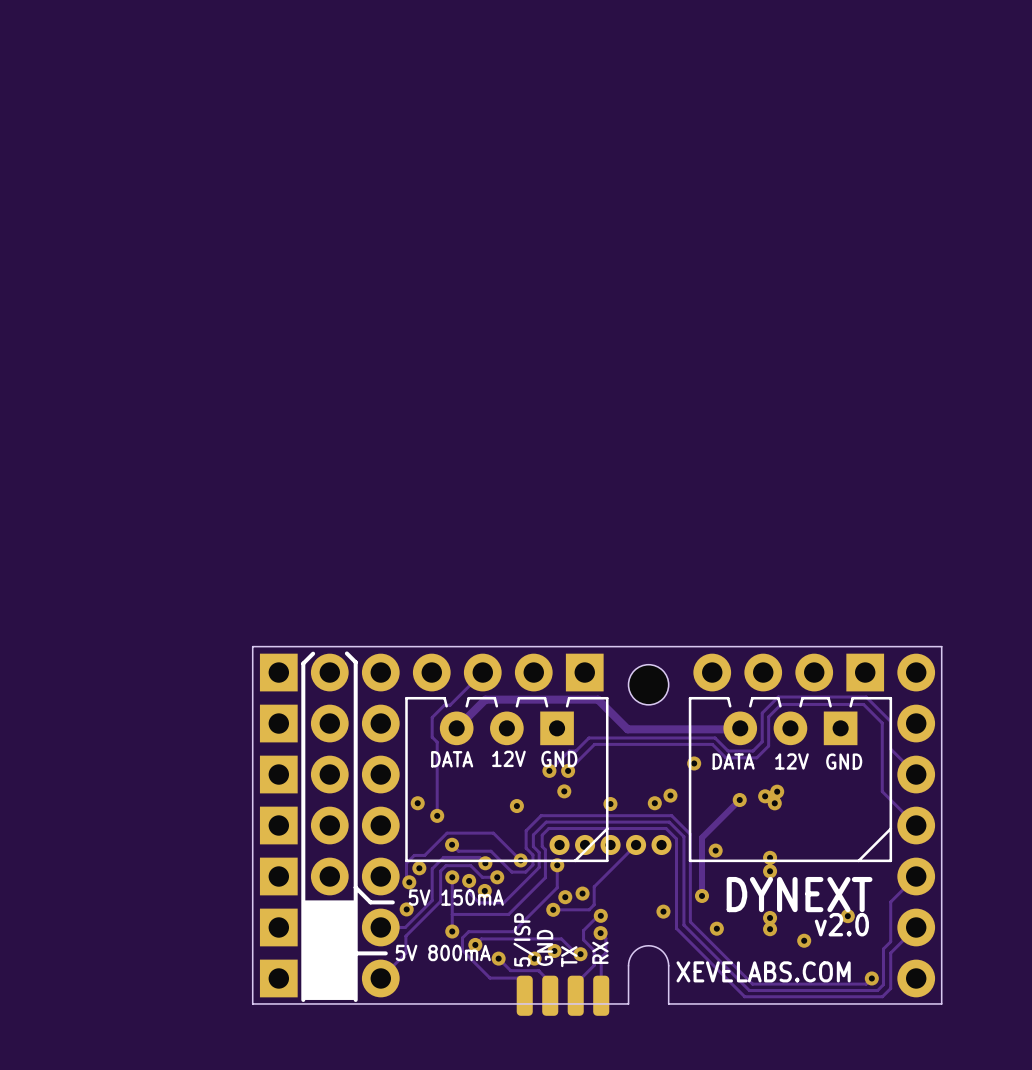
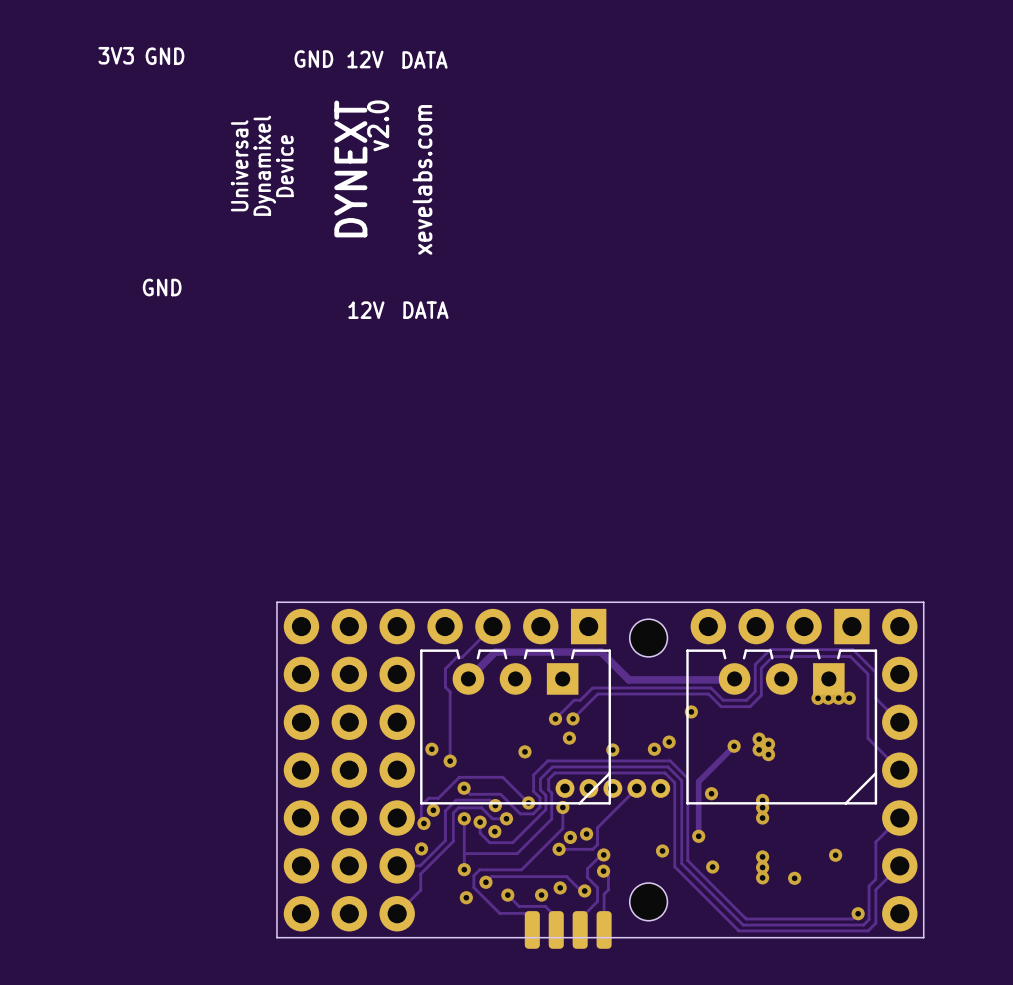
text: none -> 3V3 (116, 55)
text: none -> GND (165, 56)
text: none -> GND (313, 59)
text: none -> 12V (365, 59)
text: none -> DATA (425, 59)
text: none -> v2.0 (378, 125)
text: none -> Universal (239, 165)
text: none -> Dynamixel (264, 165)
text: none -> Device (284, 166)
text: none -> DYNEXT (350, 168)
text: none -> xevelabs.com (422, 179)
text: none -> GND (162, 287)
text: none -> 12V (366, 310)
text: none -> DATA (425, 310)
part footprint: [259, 653, 298, 998] -> [283, 608, 320, 932]
line: (313, 653) (303, 663) (303, 999) -> none
line: (346, 653) (355, 662) (355, 999) -> none
via: none -> (828, 698)
via: none -> (838, 698)
via: none -> (849, 698)
via: none -> (818, 698)
text: 12V (508, 758) -> none
text: DATA (452, 759) -> none
text: GND (559, 759) -> none
text: DATA (733, 761) -> none
text: 12V (792, 761) -> none
text: GND (844, 761) -> none
via: (777, 791) -> none
via: none -> (759, 739)
via: (765, 796) -> none
via: none -> (768, 744)
via: none -> (759, 749)
via: (774, 803) -> none
via: none -> (768, 754)
via: none -> (762, 807)
via: (770, 871) -> none
via: none -> (762, 818)
line: (355, 887) (370, 902) (392, 902) -> none
text: DYNEXT (799, 894) -> none
text: 5V 150mA (456, 897) -> none
drawing: [303, 900, 356, 1000] -> none
text: v2.0 (841, 924) -> none
text: 5/ISP (523, 939) -> none
via: none -> (762, 877)
text: GND (545, 947) -> none
text: 5V 800mA (443, 952) -> none
text: RX (600, 952) -> none
line: (385, 953) (355, 953) -> none
text: TX (569, 956) -> none
via: none -> (466, 897)
hole: none -> (648, 901)
text: XEVELABS.COM (763, 971) -> none
board edge: (668, 1003) (667, 958) (660, 949) (648, 945) (636, 949) (630, 958) (628, 1003) -> (667, 937) (629, 937)

